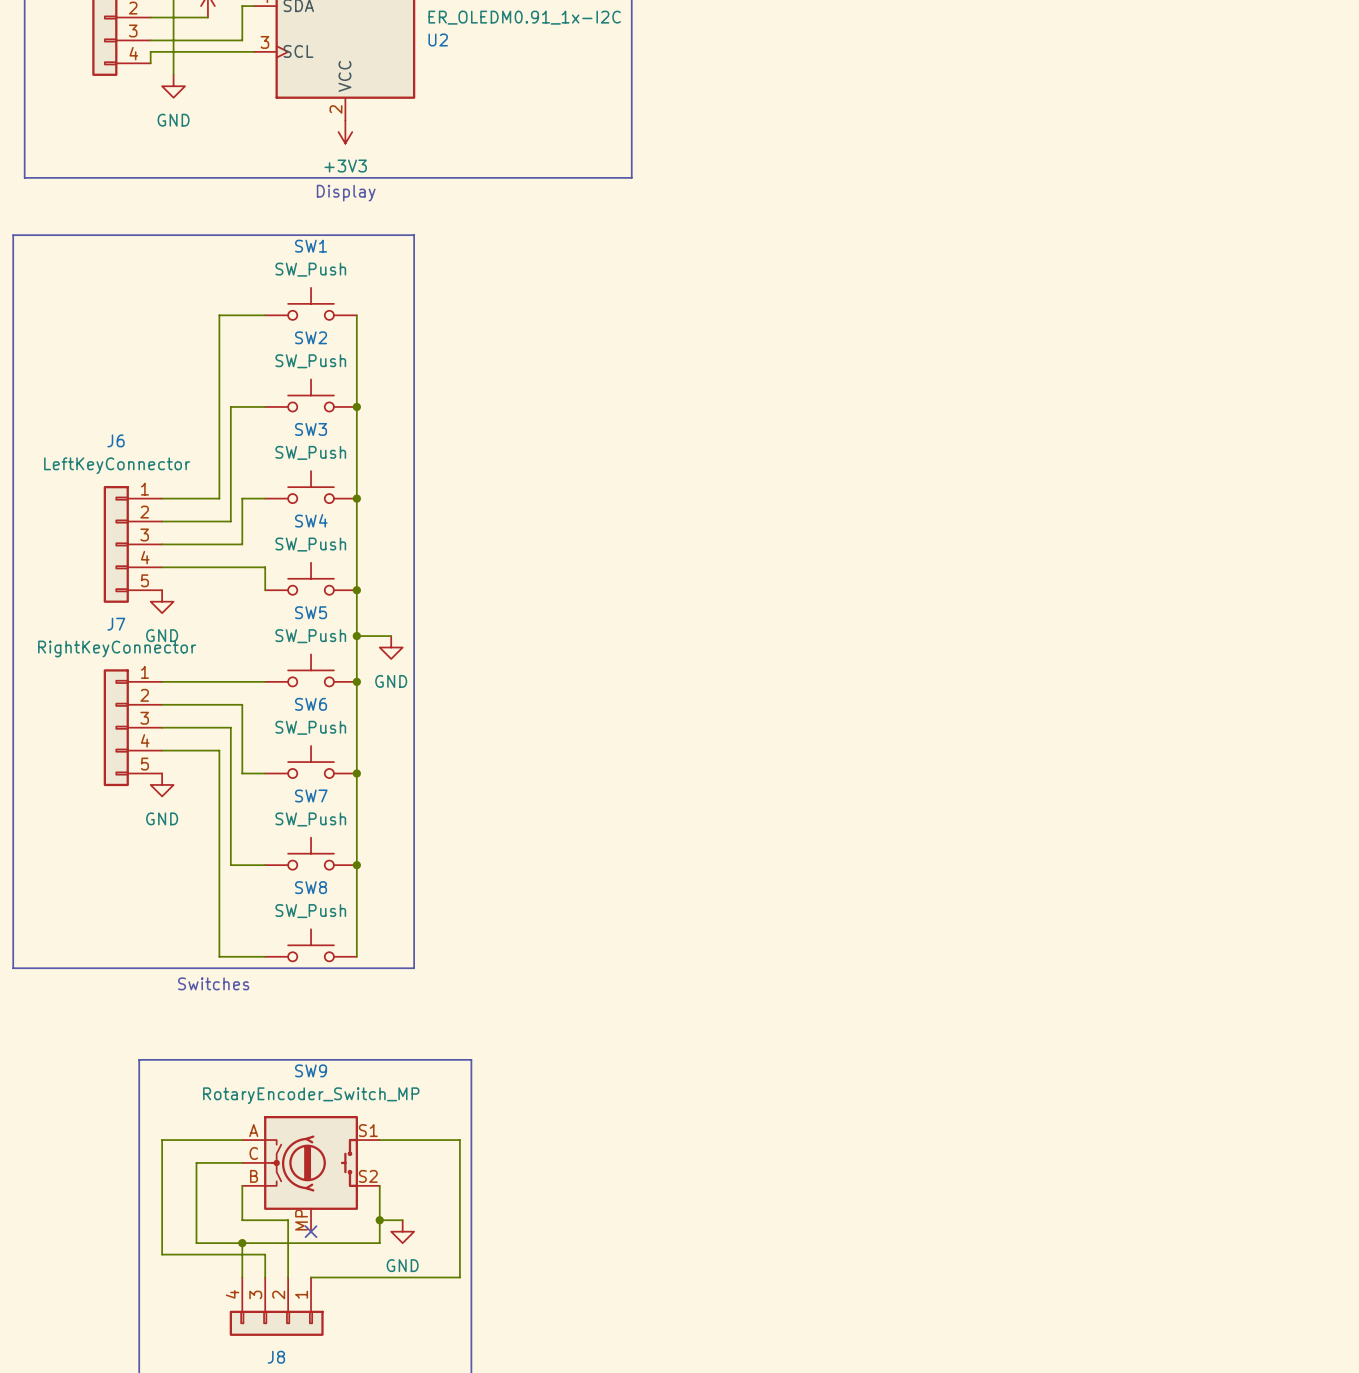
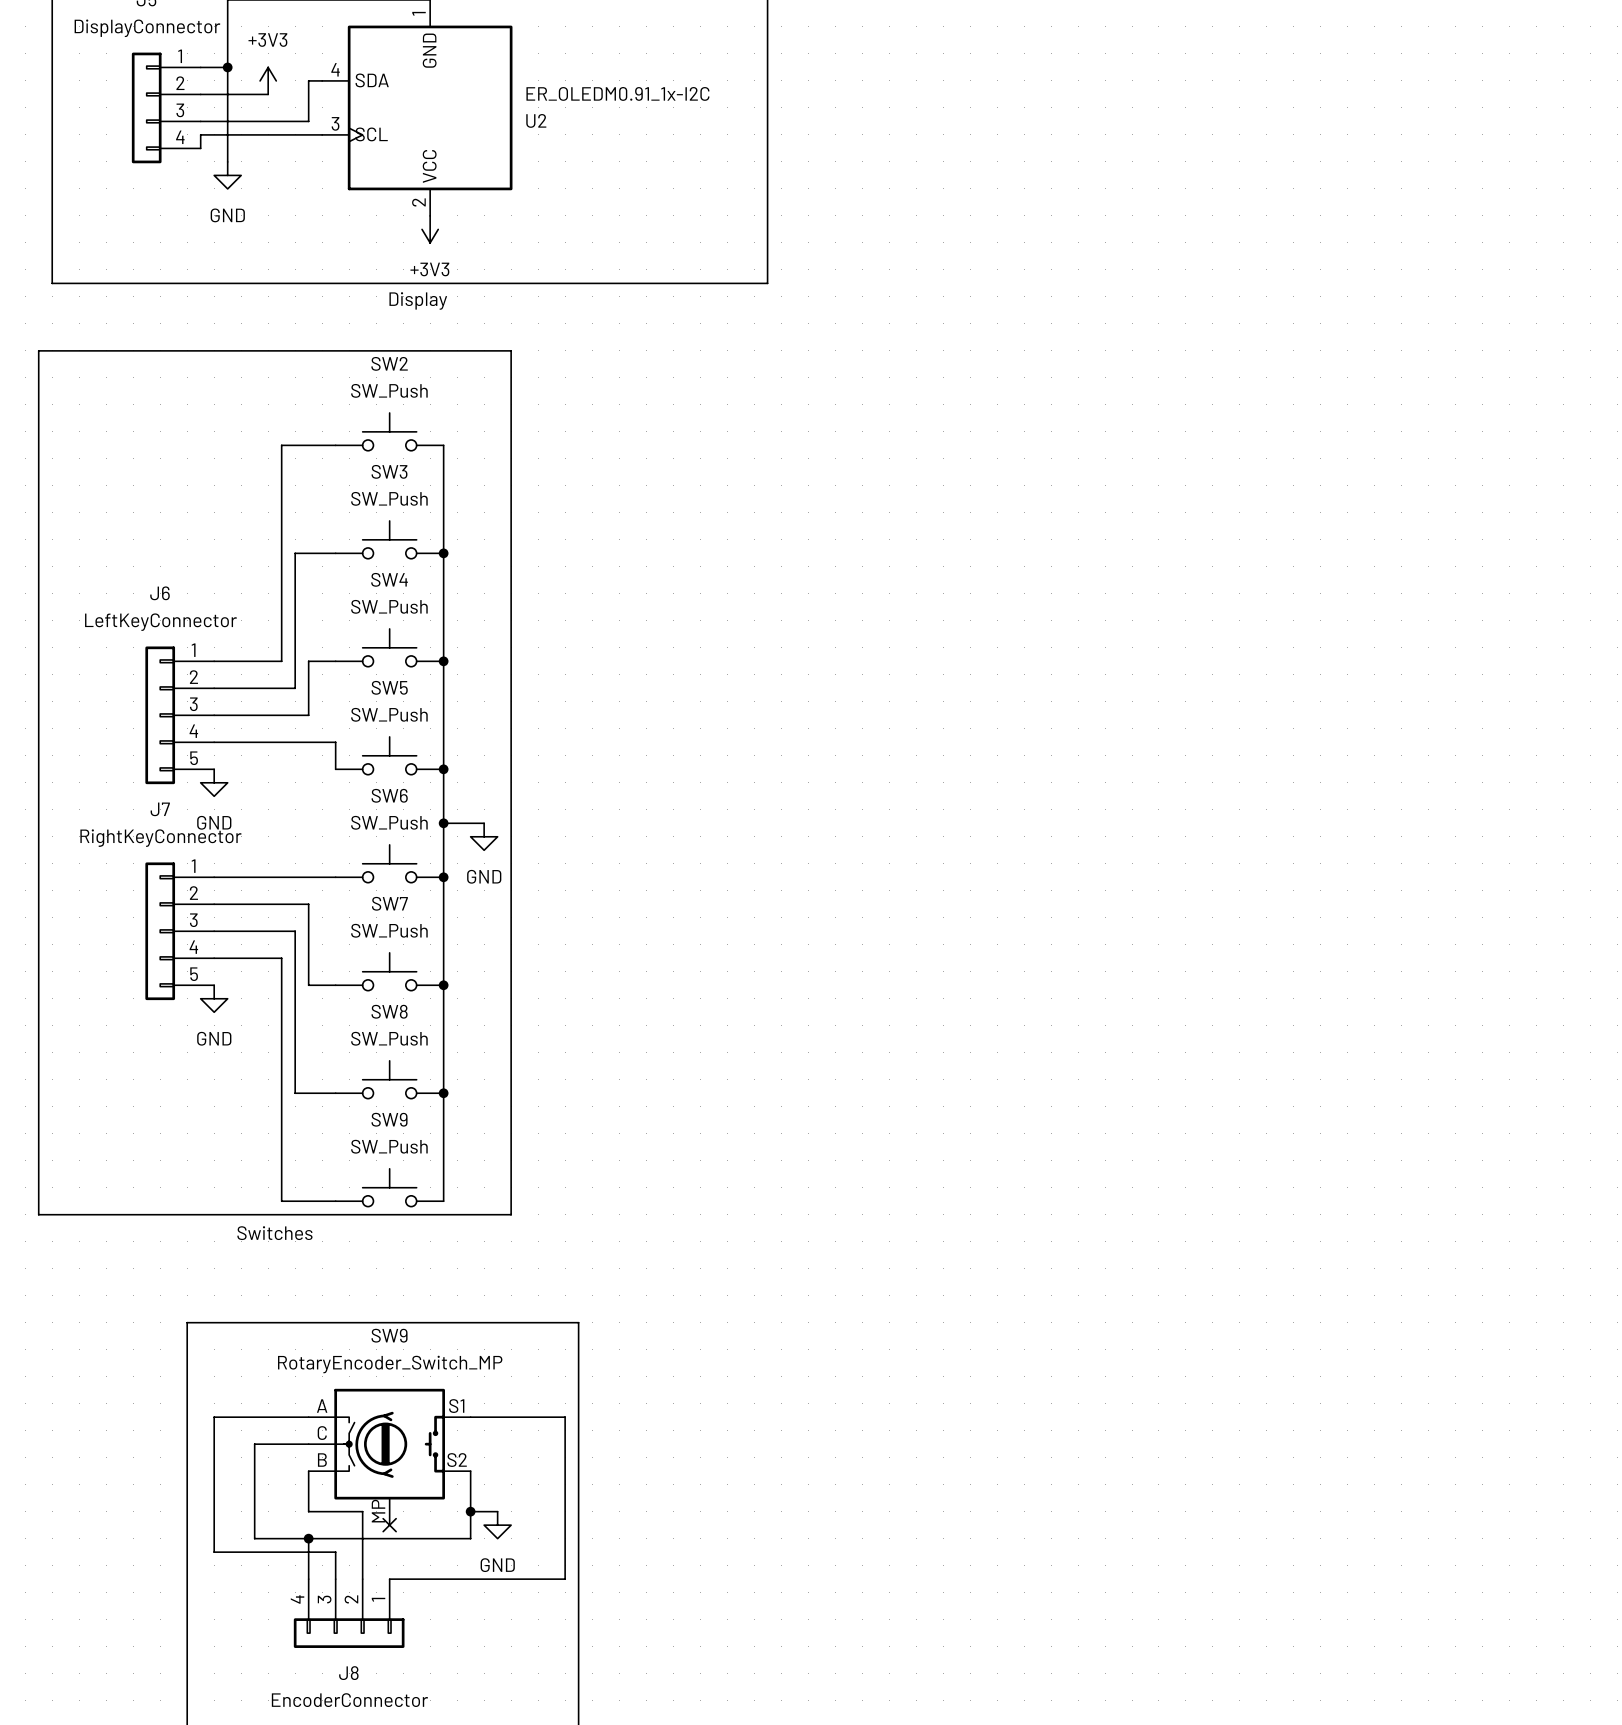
SW1 name: SW1 (311, 246) -> SW2 (389, 363)
SW2 name: SW2 (311, 337) -> SW3 (389, 471)
SW3 name: SW3 (311, 429) -> SW4 (389, 579)
SW4 name: SW4 (311, 520) -> SW5 (389, 687)
SW5 name: SW5 (311, 612) -> SW6 (389, 795)
SW6 name: SW6 (311, 704) -> SW7 (389, 903)
SW7 name: SW7 (311, 795) -> SW8 (389, 1011)
SW8 name: SW8 (311, 887) -> SW9 (389, 1119)

